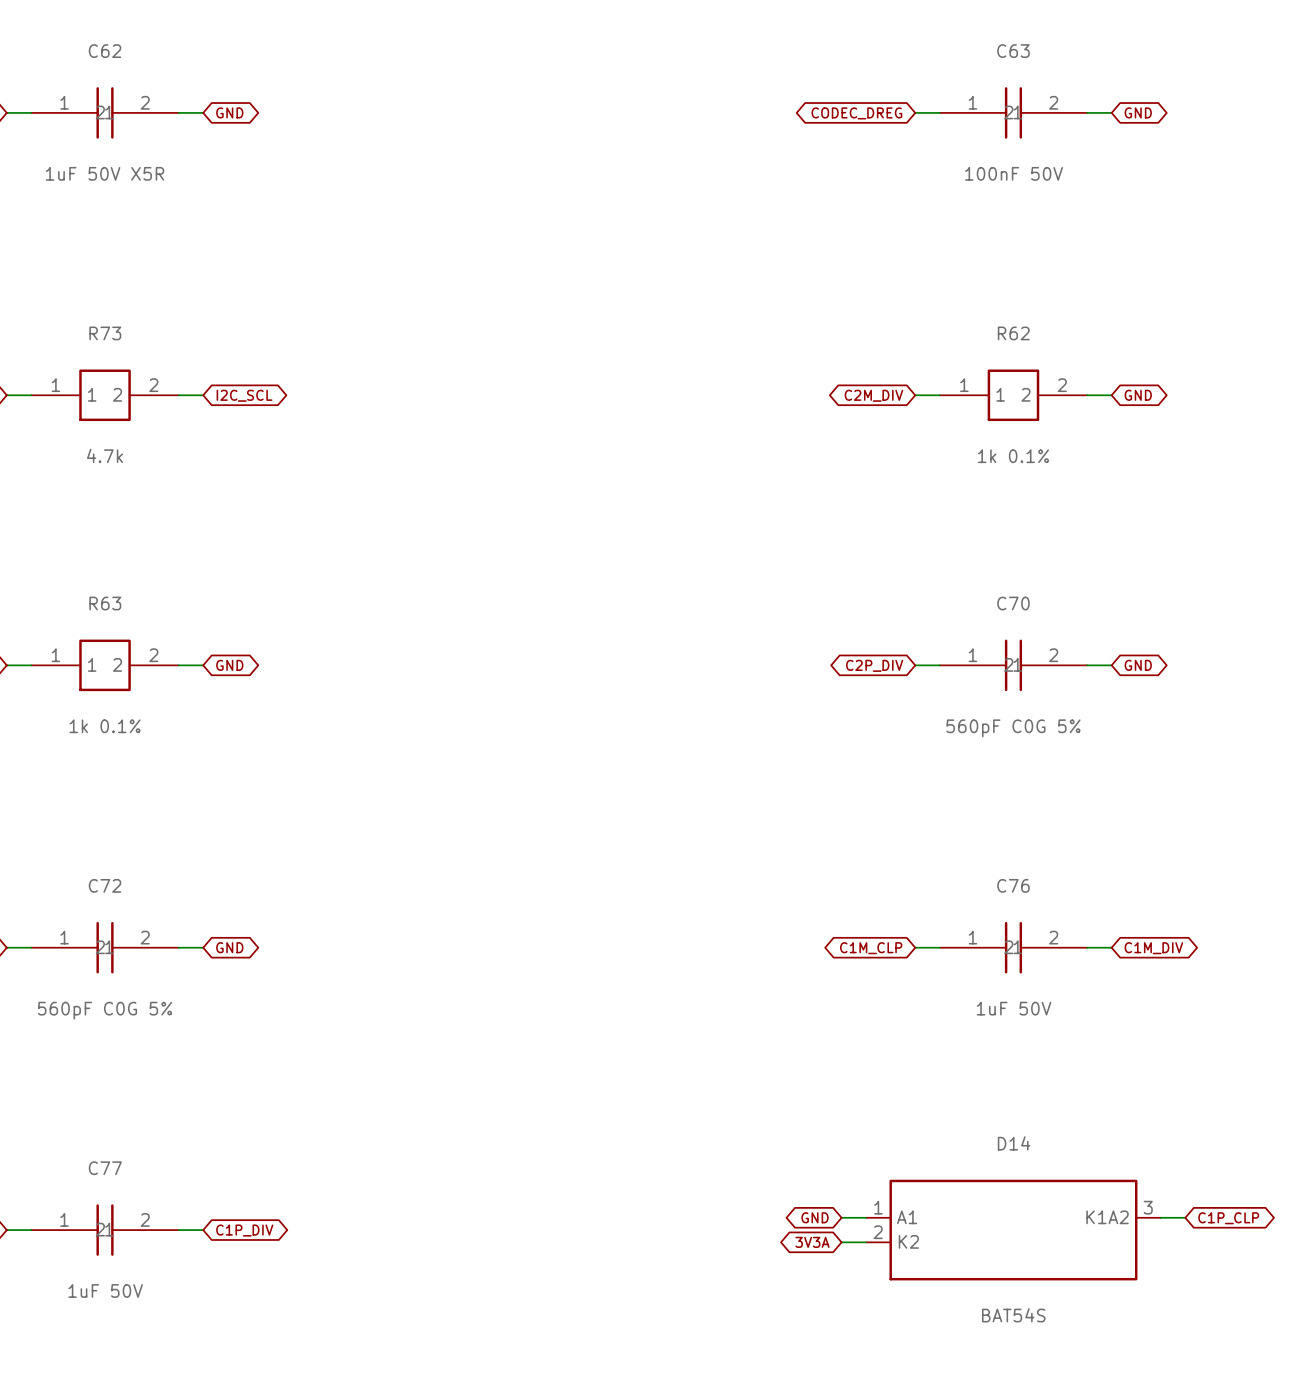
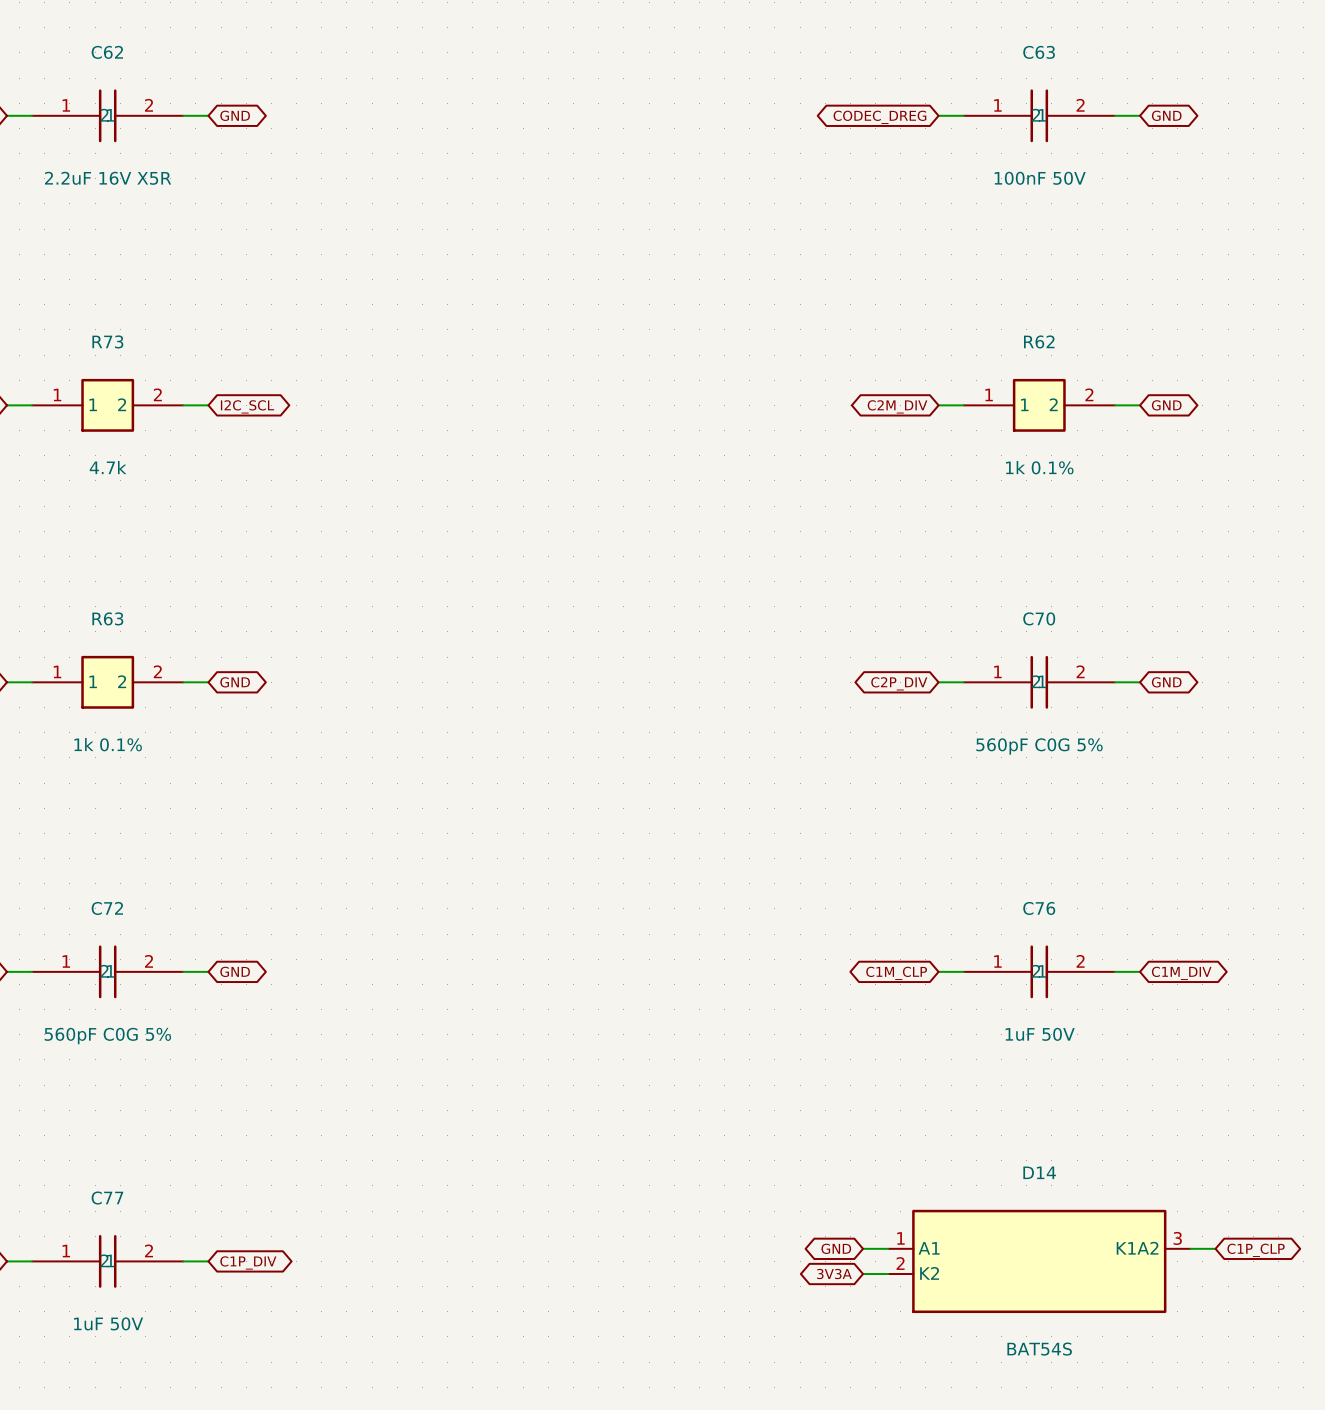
C62 value: 1uF 50V X5R (105, 173) -> 2.2uF 16V X5R (108, 178)

